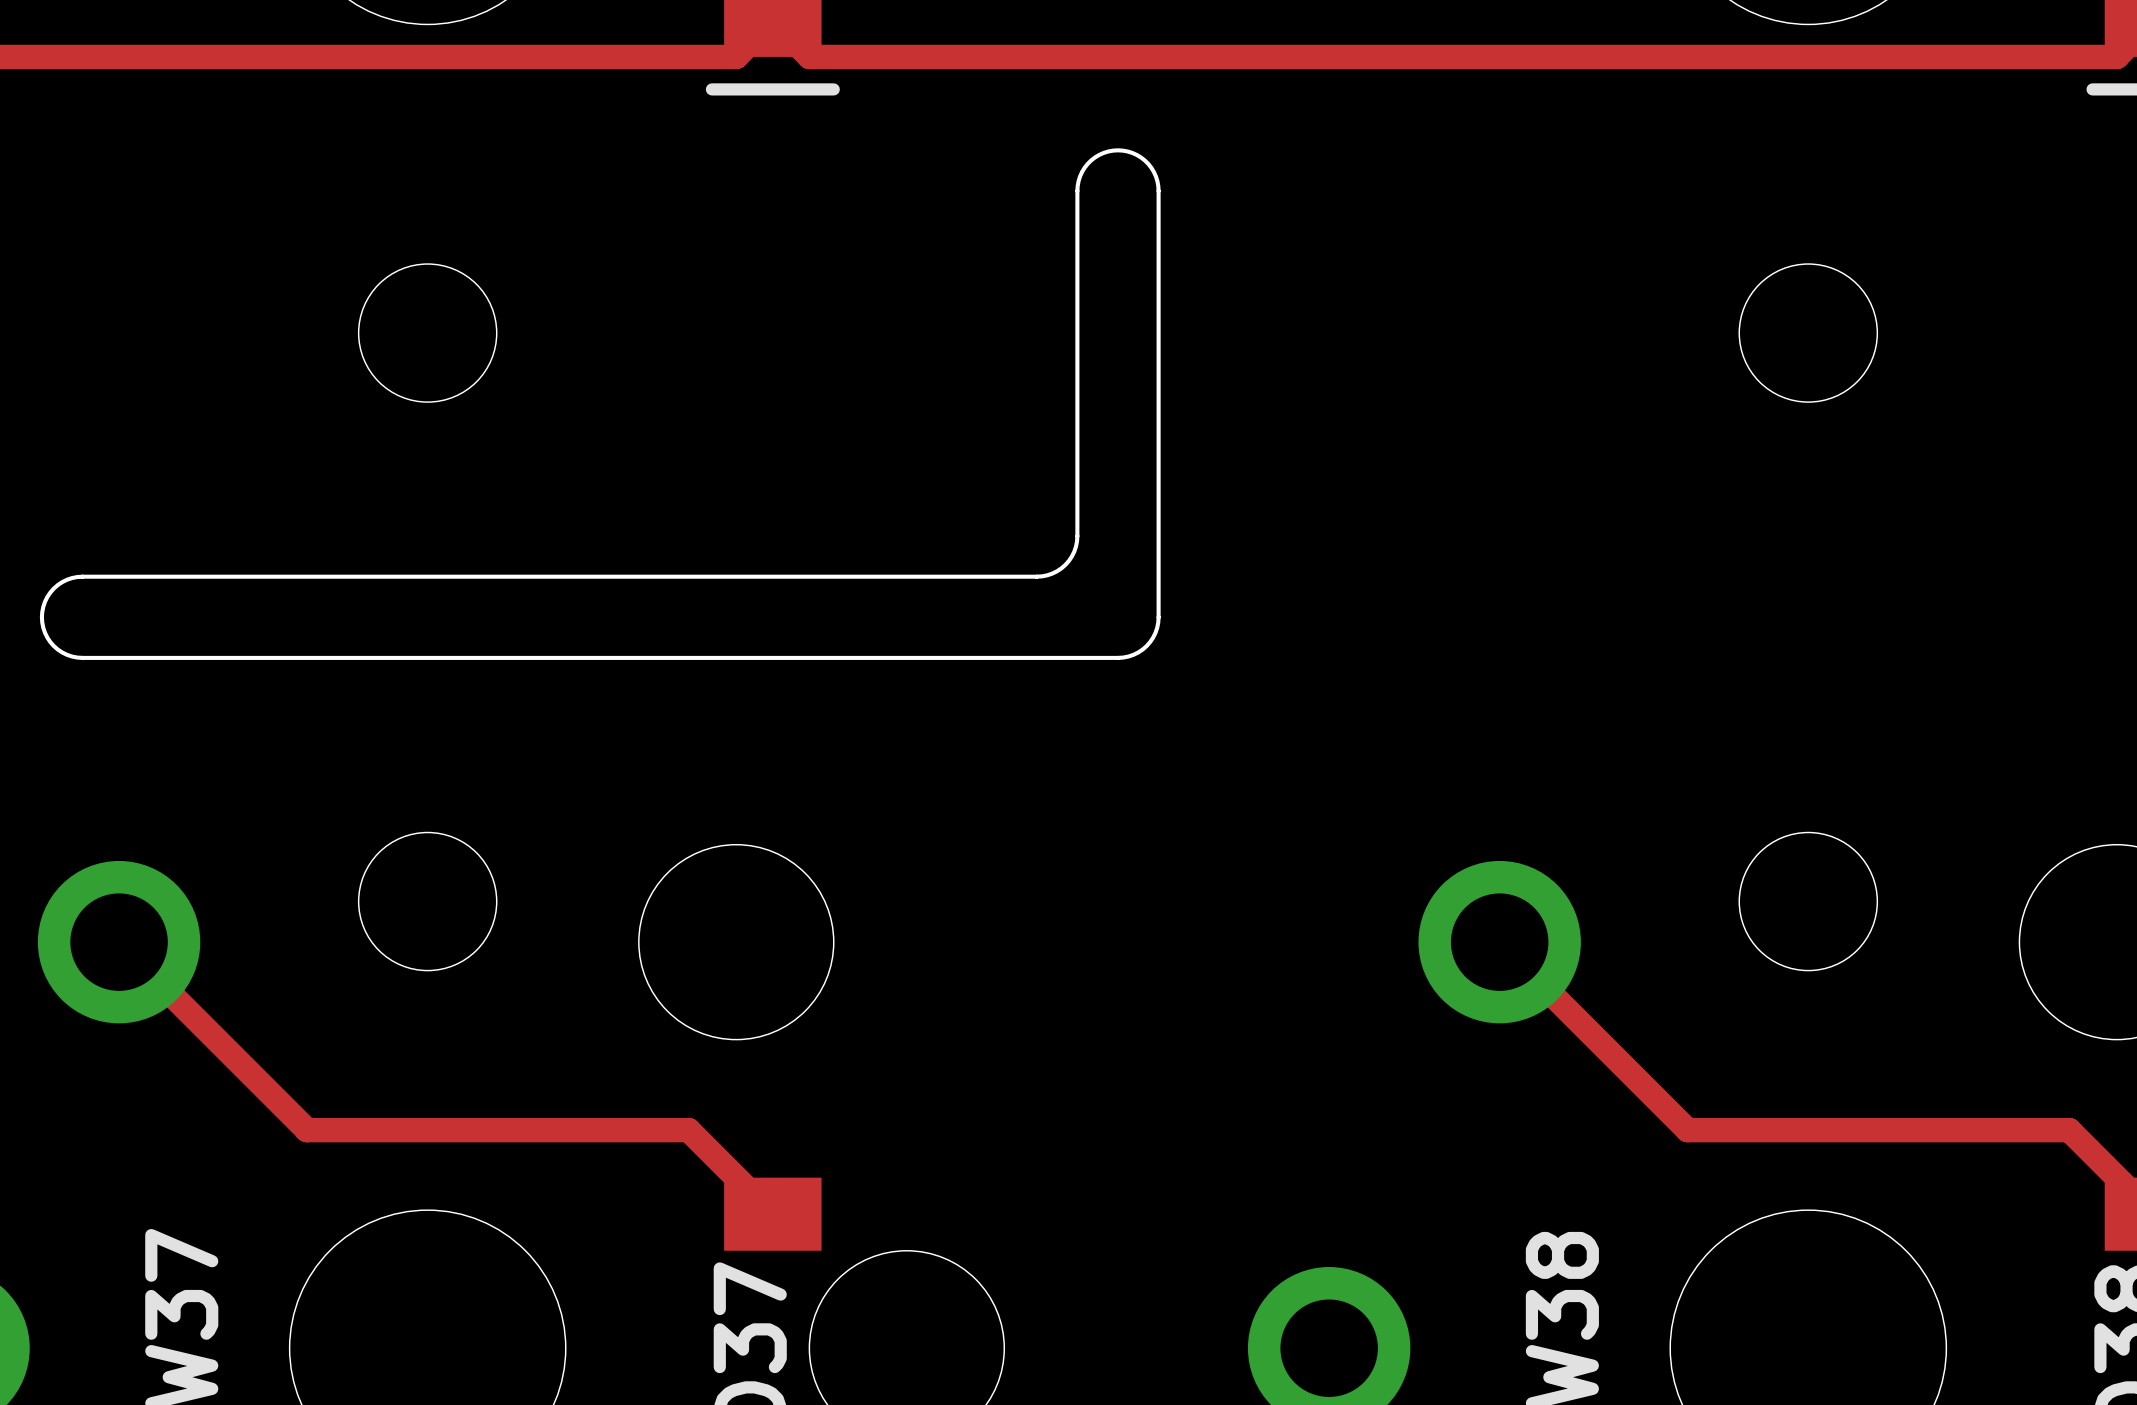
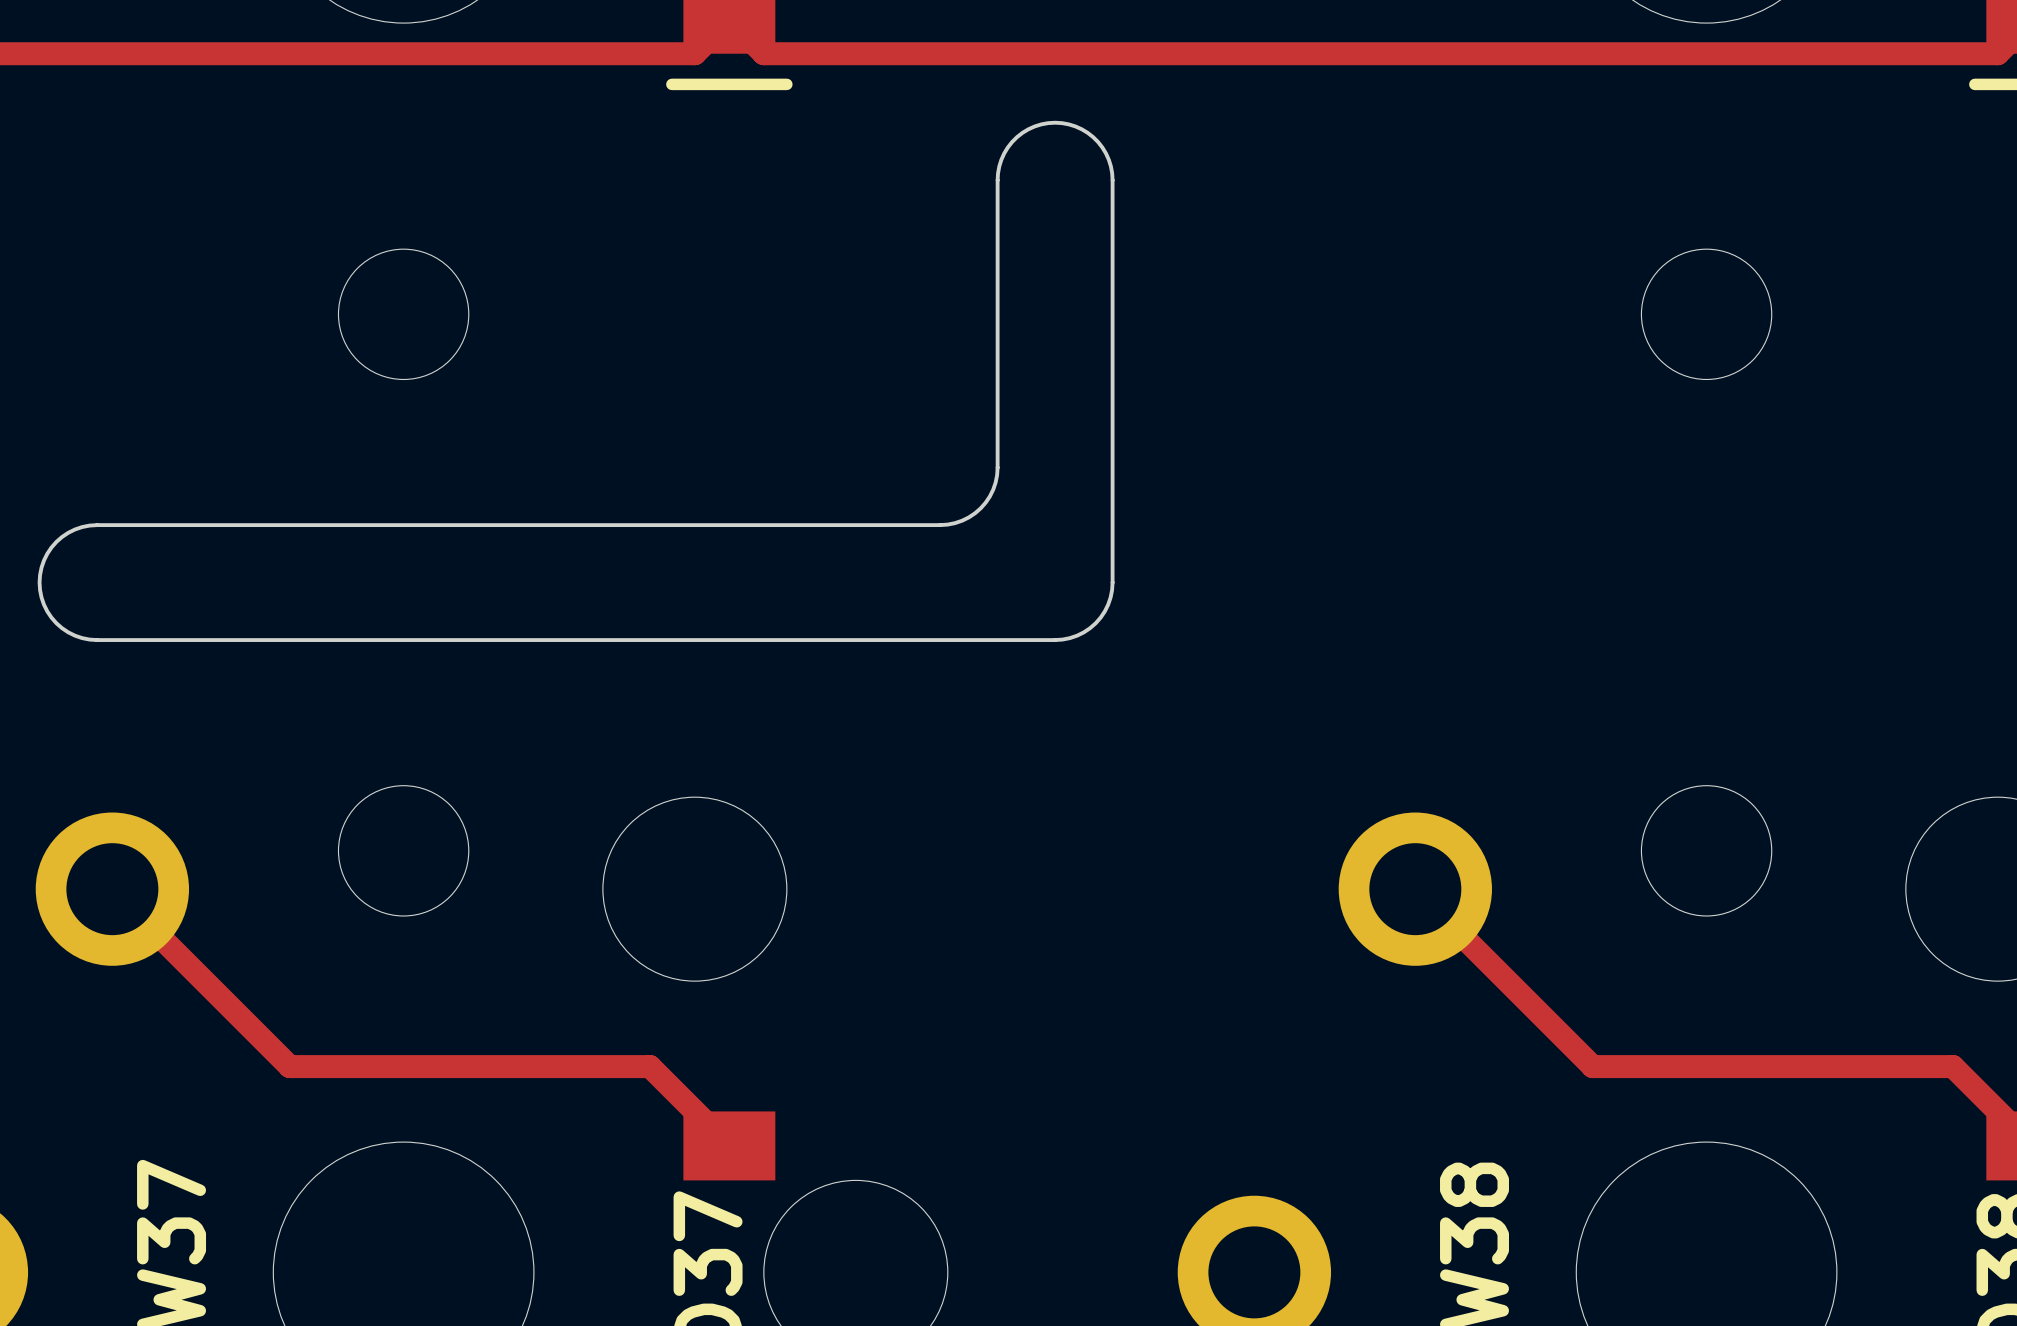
board edge: (1077, 190) (1077, 536) (1076, 546) (1068, 560) (1052, 573) (1036, 576) (82, 576) (62, 582) (50, 592) (42, 612) (45, 632) (57, 649) (72, 656) (82, 657) (1117, 657) (1133, 654) (1150, 642) (1155, 632) (1158, 617) (1158, 186) (1153, 172) (1144, 160) (1132, 152) (1113, 150) (1099, 154) (1087, 164) (1080, 176) (1077, 190) -> (997, 180) (997, 475) (993, 489) (985, 502) (975, 513) (962, 520) (940, 525) (89, 525) (75, 529) (62, 536) (47, 553) (41, 567) (39, 582) (43, 604) (51, 617) (62, 628) (82, 638) (97, 640) (1055, 640) (1077, 635) (1090, 628) (1100, 617) (1108, 604) (1112, 590) (1112, 173) (1106, 153) (1093, 137) (1075, 126) (1062, 123) (1048, 123) (1028, 129) (1012, 142) (1001, 159) (997, 180)

